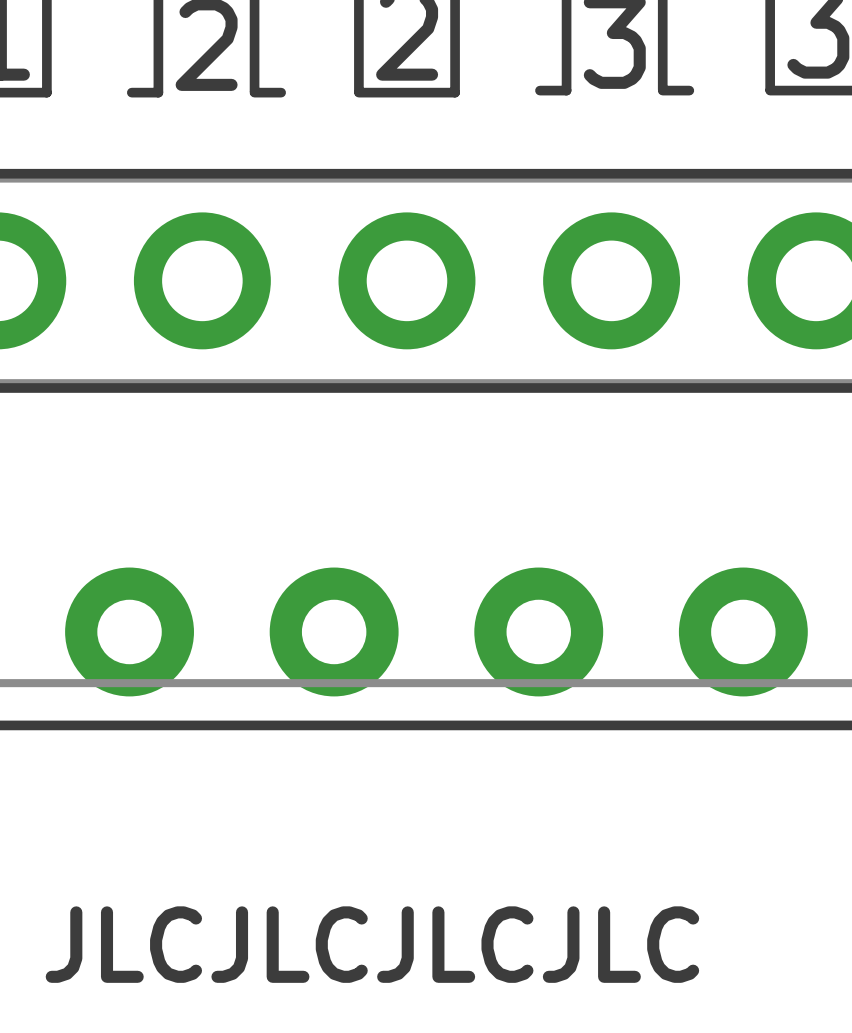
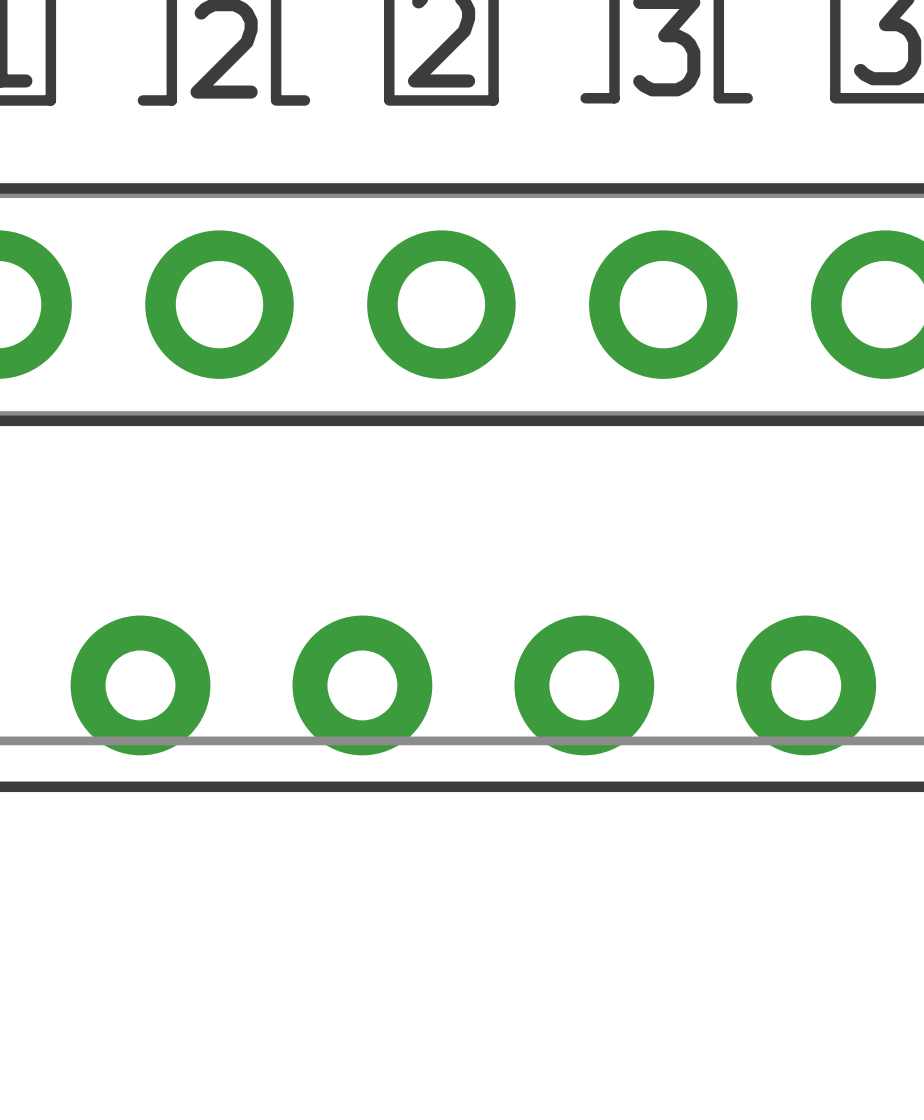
text: JLCJLCJLCJLC (372, 944) -> none

